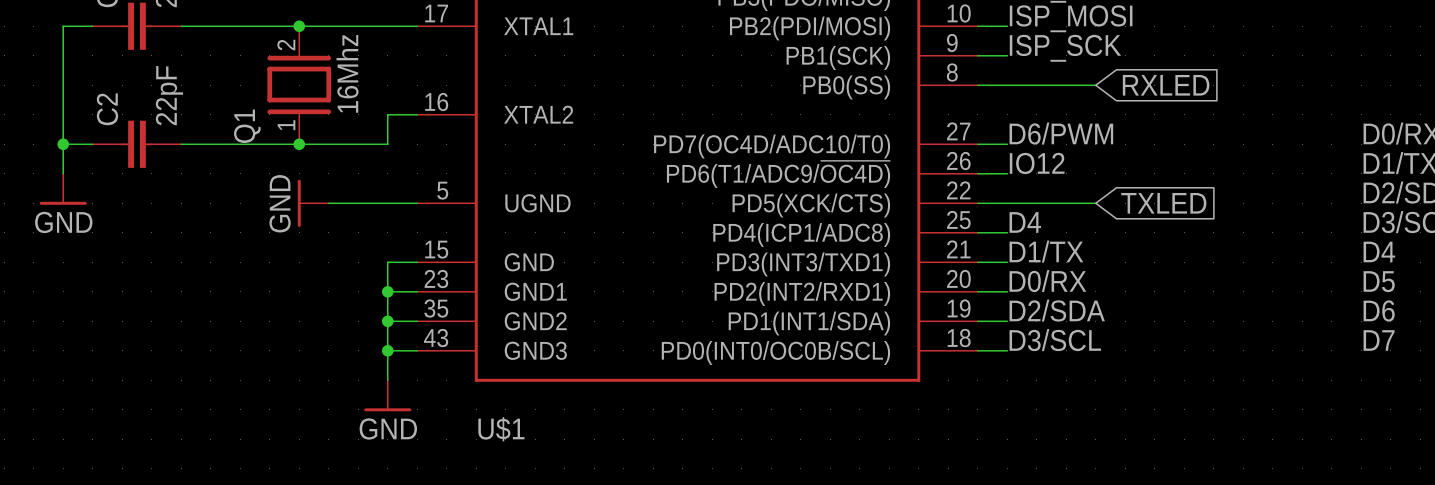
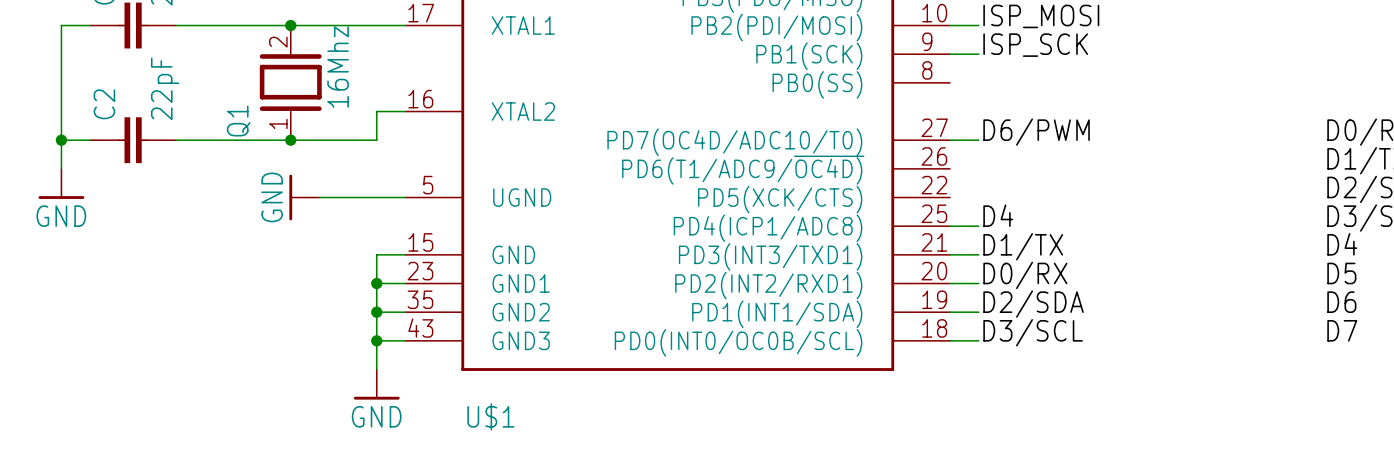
wire: (977, 85) (1095, 85) -> none
global label: RXLED (1166, 85) -> none
label: IO12 (1037, 163) -> none
wire: (977, 173) (1007, 173) -> none
wire: (977, 203) (1095, 203) -> none
global label: TXLED (1163, 203) -> none

